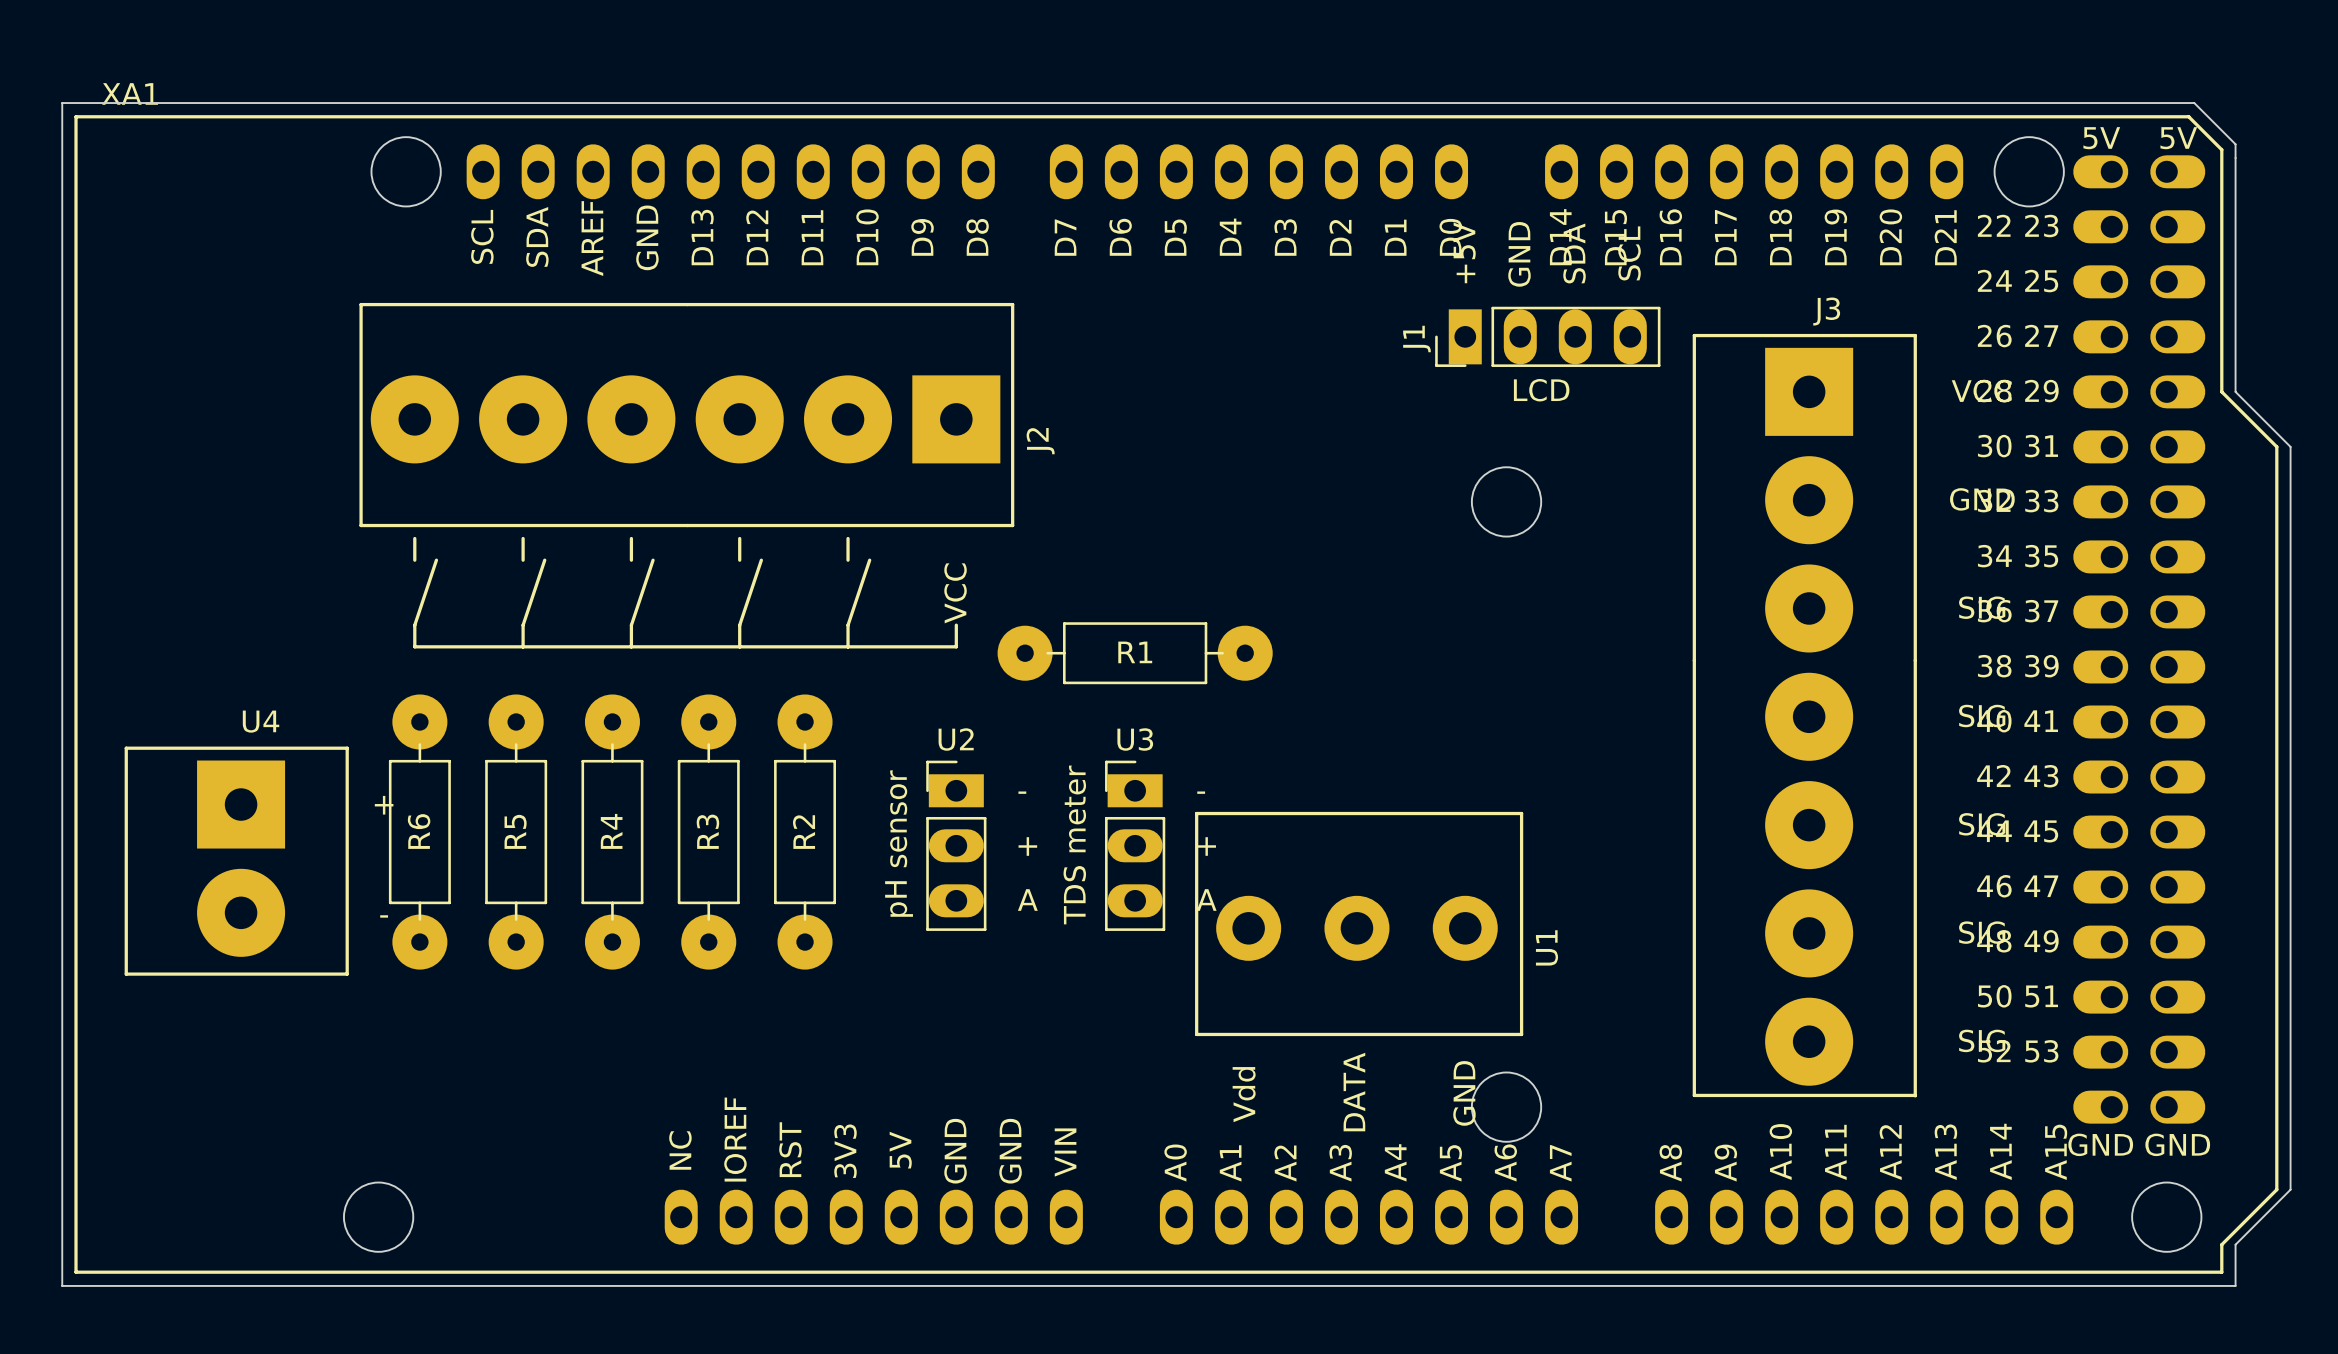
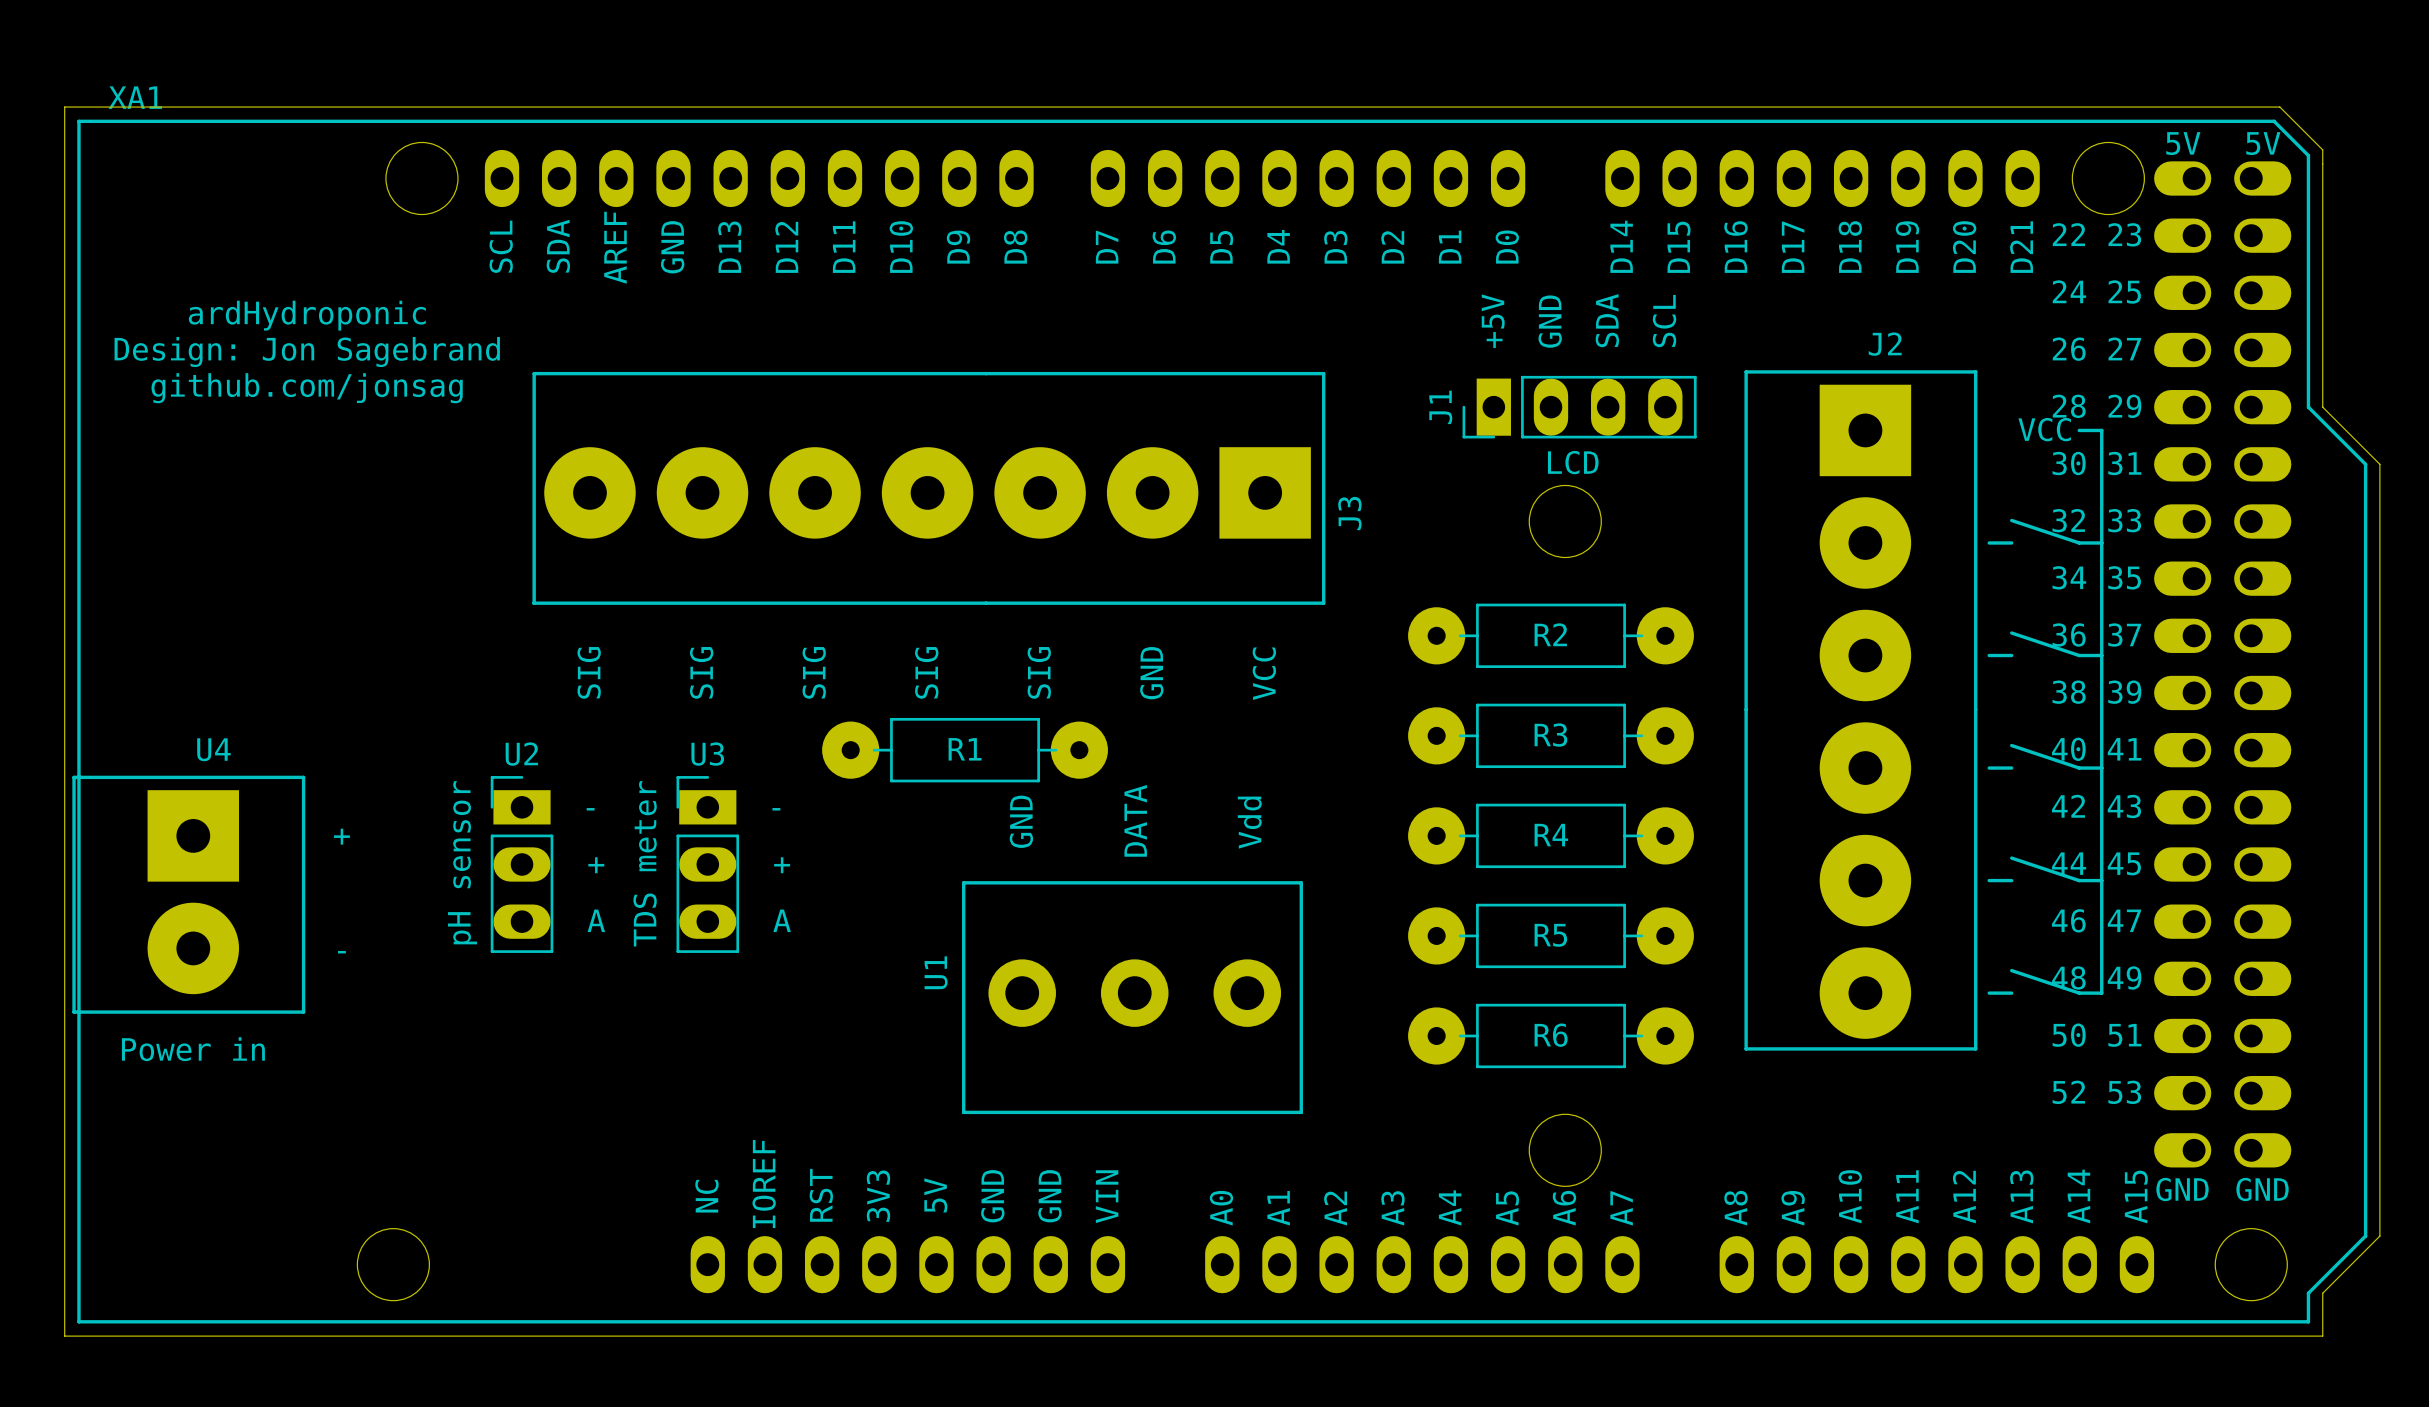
text: none -> ardHydroponic (307, 315)
J1 position: (1547, 336) -> (1579, 407)
text: none -> Design: Jon Sagebrand (307, 351)
text: none -> github.com/jonsag (307, 388)
J2 rotation: 0° (686, 475) -> 90° counterclockwise (1923, 710)
J2 position: (686, 475) -> (1923, 710)
R1 position: (1135, 653) -> (965, 750)
J3 rotation: 0° (1804, 715) -> 90° clockwise (928, 488)
J3 position: (1804, 715) -> (928, 488)
R6 rotation: 0° (419, 832) -> 90° clockwise (1550, 1035)
R6 position: (419, 832) -> (1550, 1035)
R5 rotation: 0° (516, 832) -> 90° clockwise (1550, 935)
R5 position: (516, 832) -> (1550, 935)
R4 rotation: 0° (612, 832) -> 90° clockwise (1550, 835)
R4 position: (612, 832) -> (1550, 835)
R3 rotation: 0° (708, 832) -> 90° clockwise (1550, 735)
R3 position: (708, 832) -> (1550, 735)
R2 rotation: 0° (805, 832) -> 90° clockwise (1550, 635)
R2 position: (805, 832) -> (1550, 635)
U2 position: (956, 845) -> (522, 864)
U3 position: (1135, 845) -> (707, 864)
U4 position: (236, 861) -> (188, 894)
U1 rotation: 0° (1359, 923) -> 180° (1132, 997)
U1 position: (1359, 923) -> (1132, 997)
text: none -> Power in (193, 1049)

